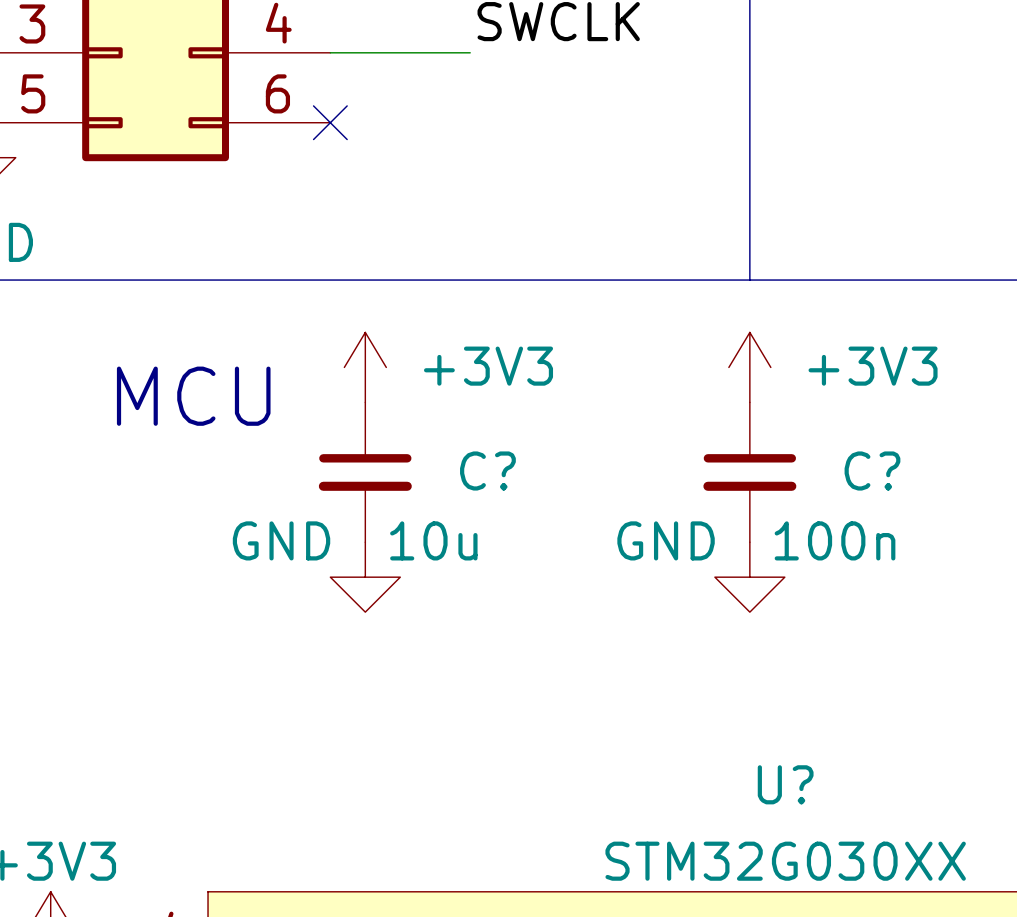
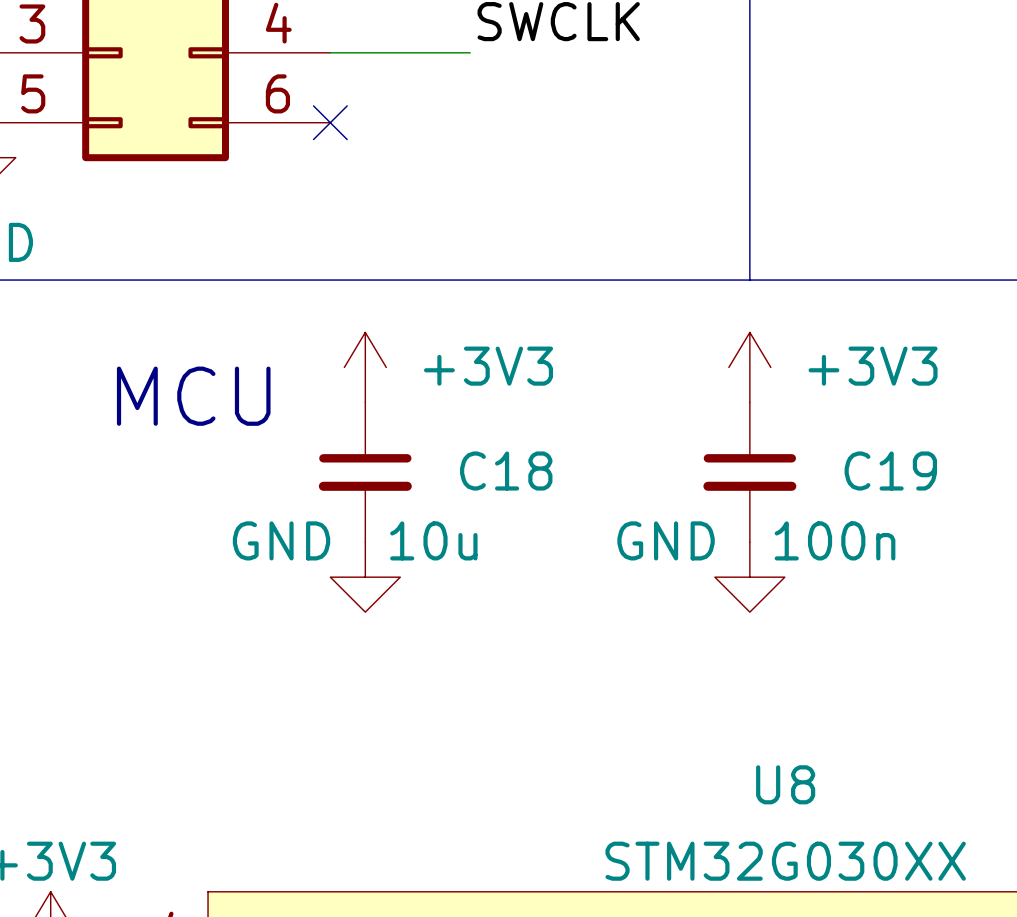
C? name: C? (487, 471) -> C18 (506, 471)
C? name: C? (872, 471) -> C19 (890, 471)
U? name: U? (785, 784) -> U8 (785, 784)

